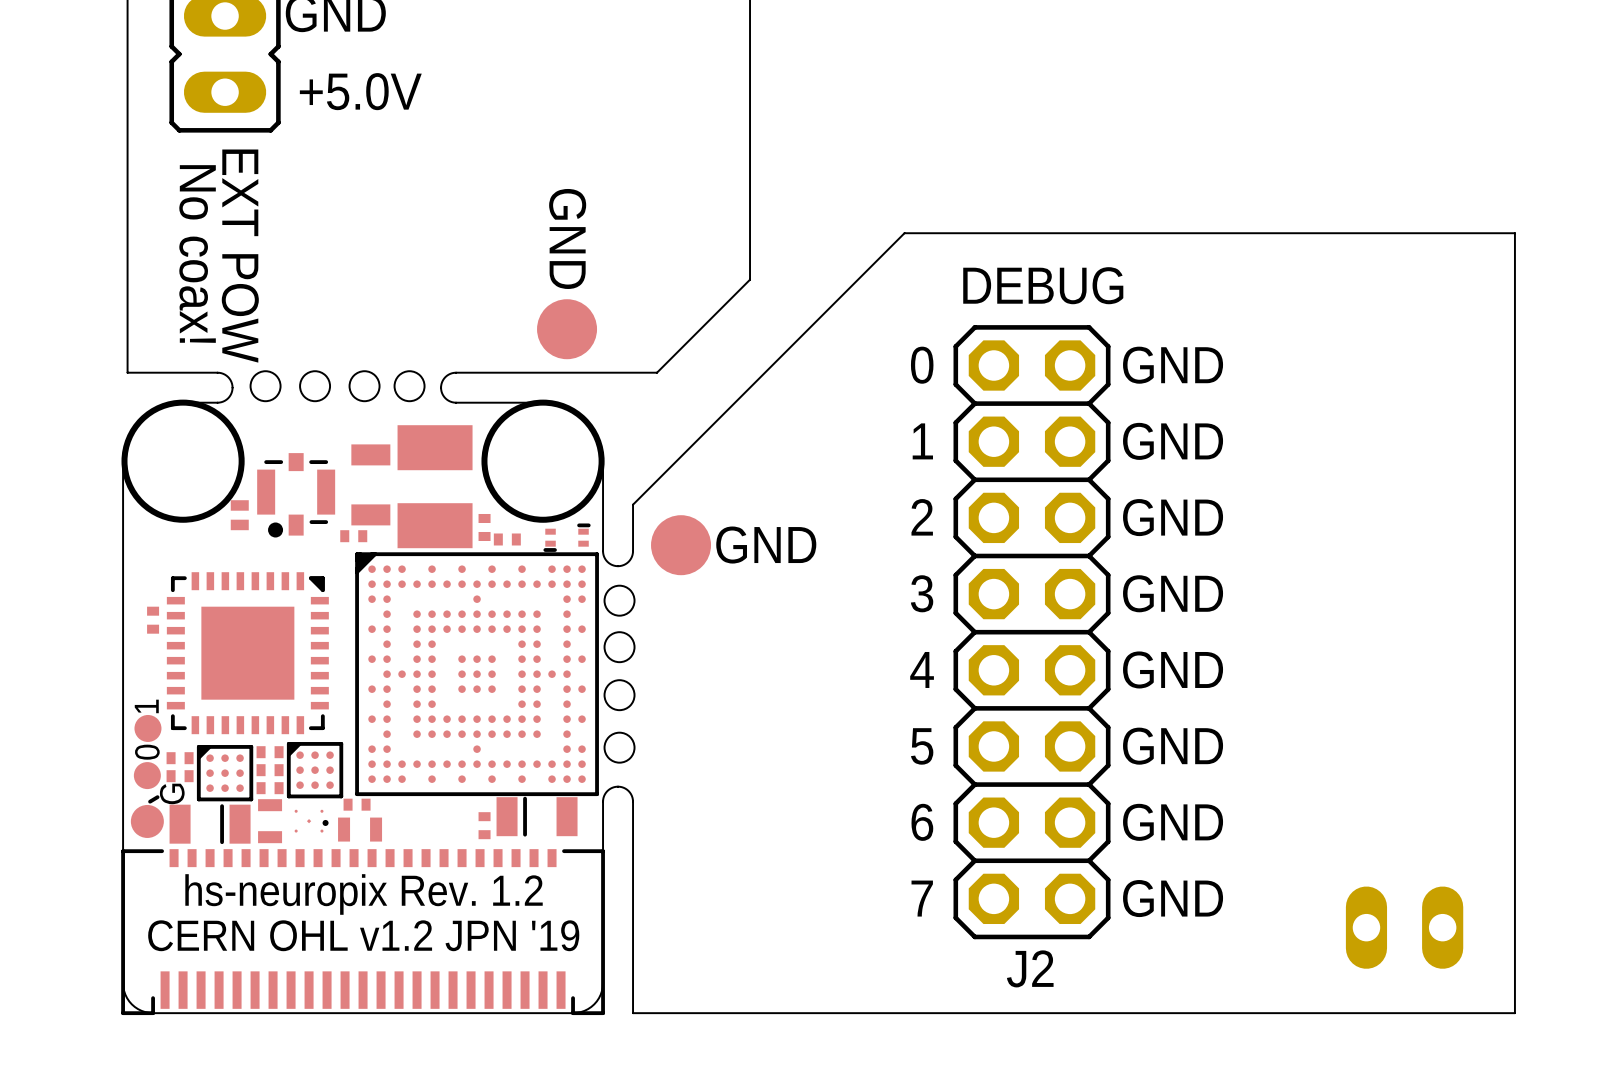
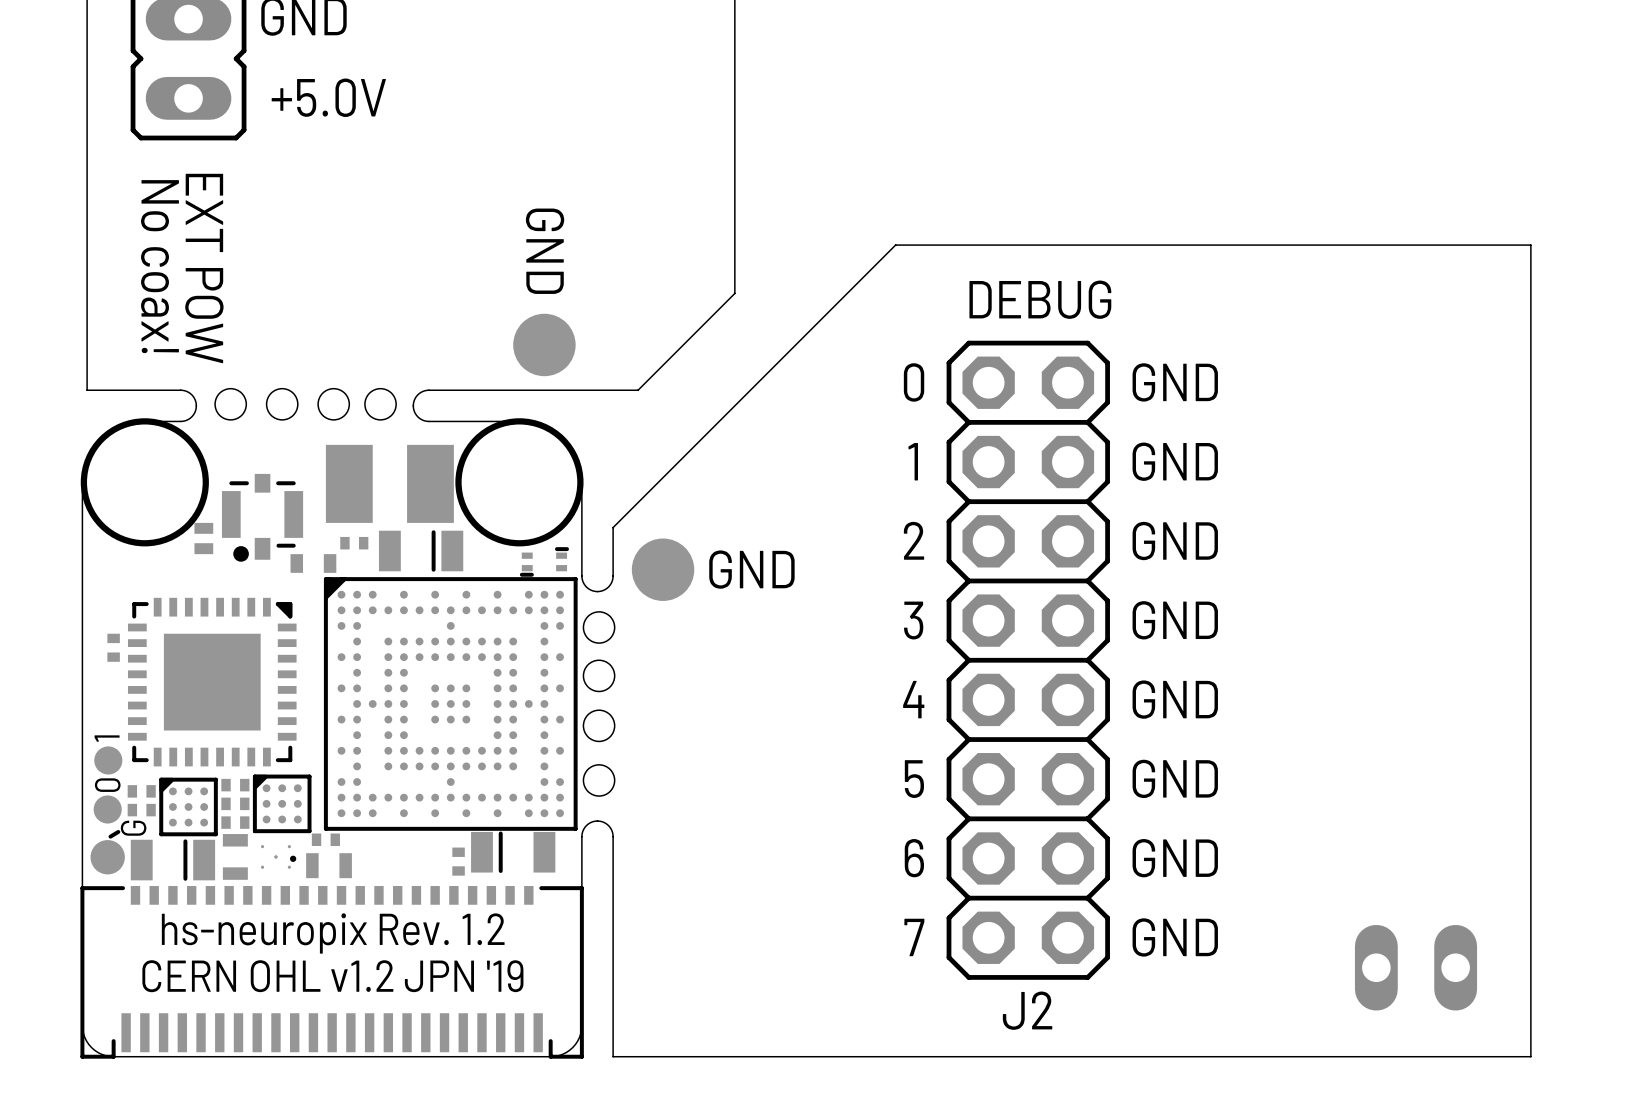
part: (370, 484) -> none
part rotation: 0° (435, 486) -> 90° clockwise (389, 483)
part: none -> (354, 543)
part: none -> (421, 551)
part: (484, 527) -> none
part footprint: [340, 530, 368, 543] -> [290, 554, 337, 573]
part: (507, 539) -> none

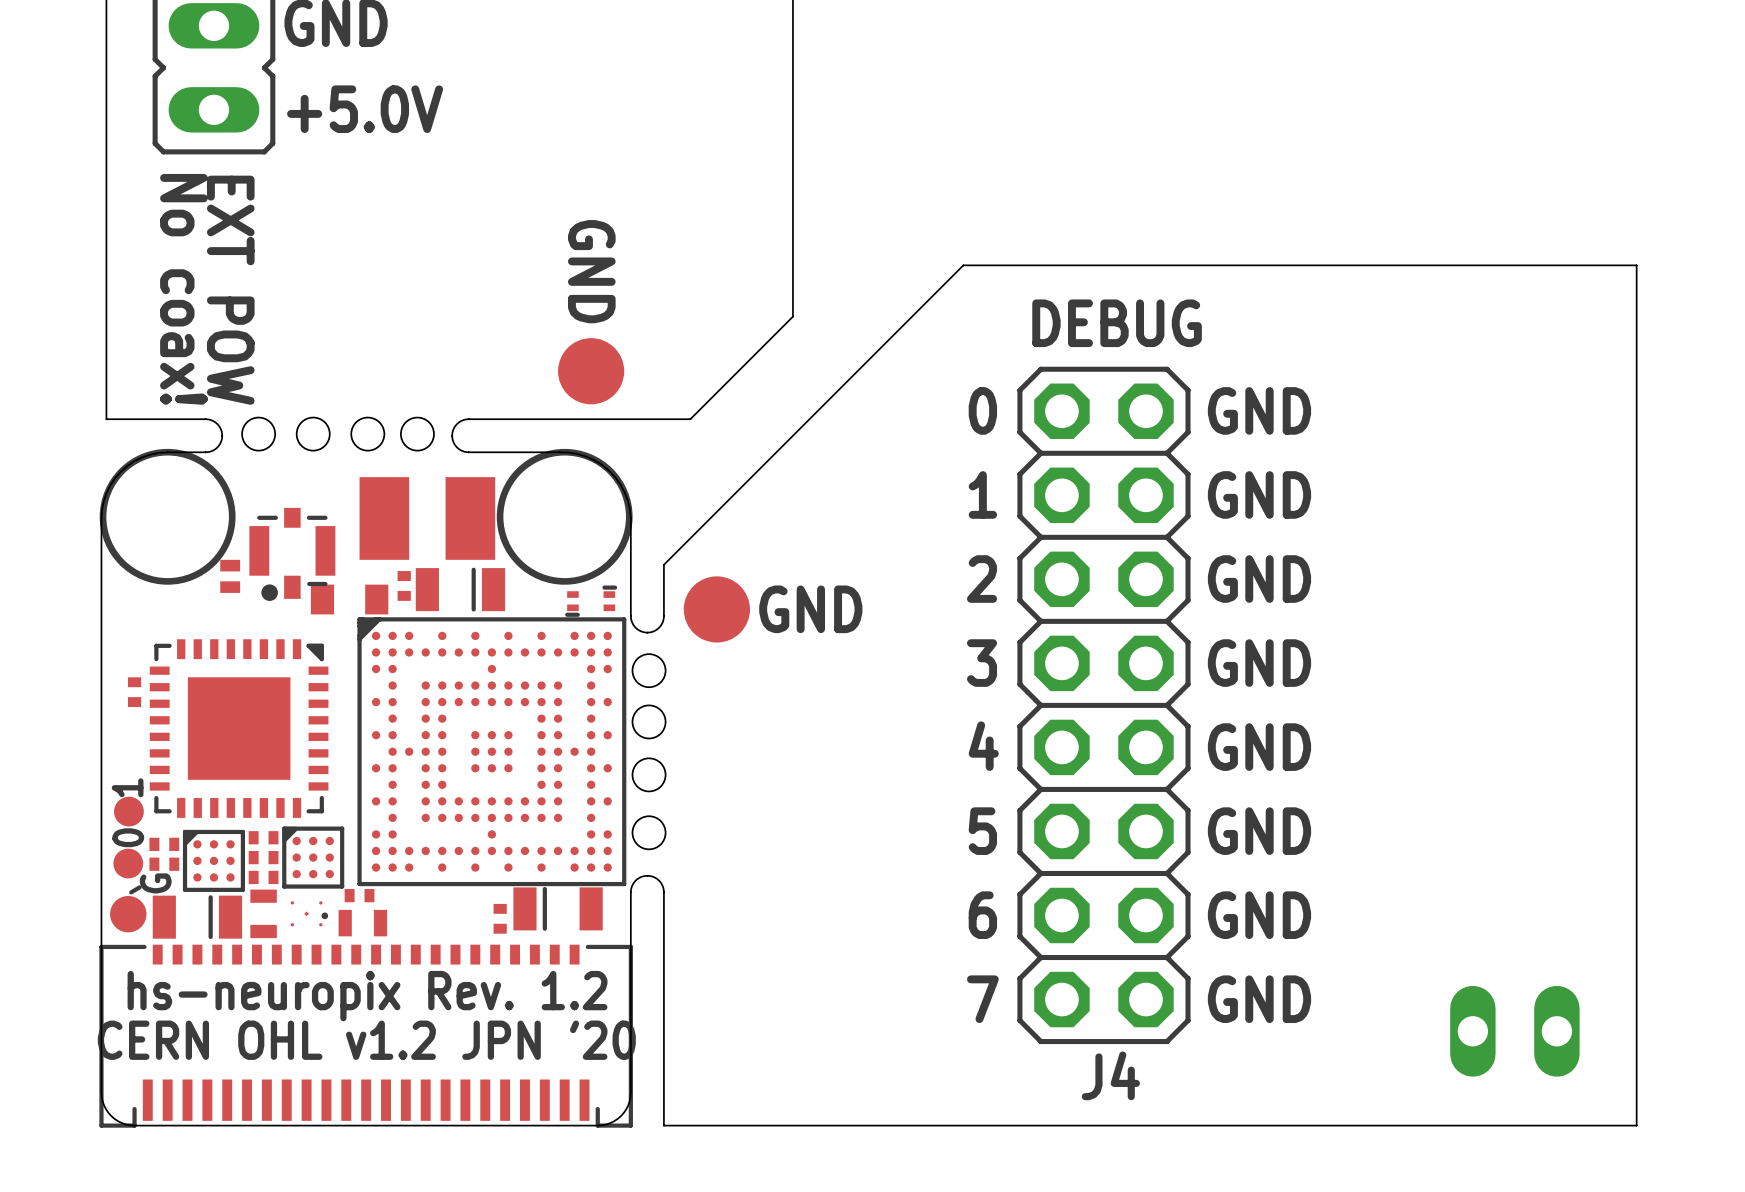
part rotation: 0° (354, 543) -> 90° clockwise (404, 585)
part footprint: [290, 554, 337, 573] -> [310, 584, 389, 615]
text: CERN OHL v1.2 JPN '19 (332, 976) -> CERN OHL v1.2 JPN '20 (366, 1040)
J2 name: J2 (1027, 1010) -> J4 (1110, 1075)

